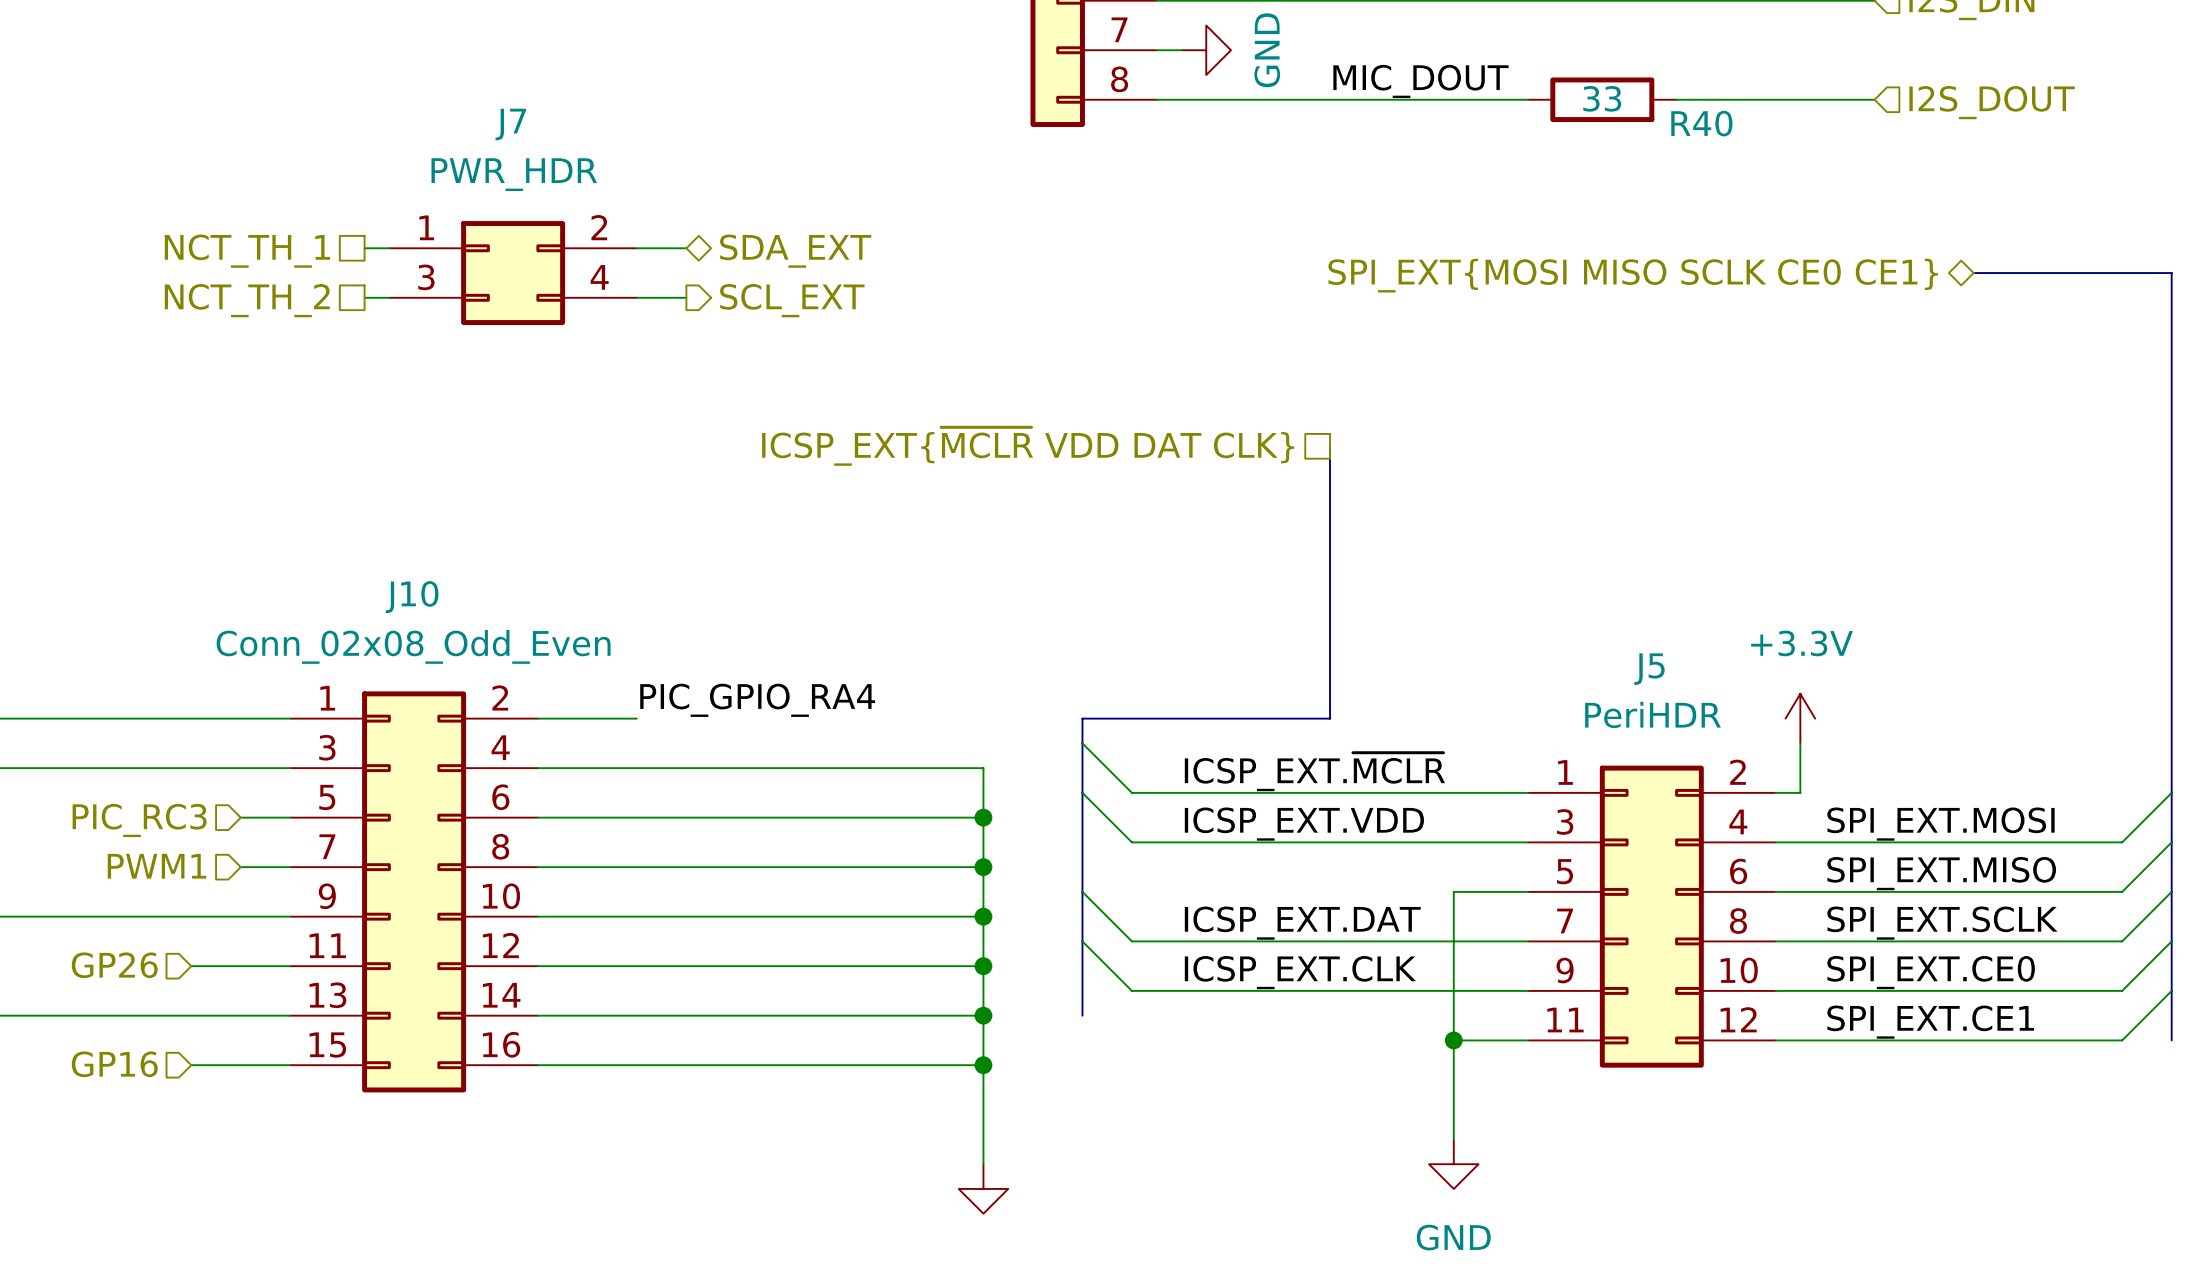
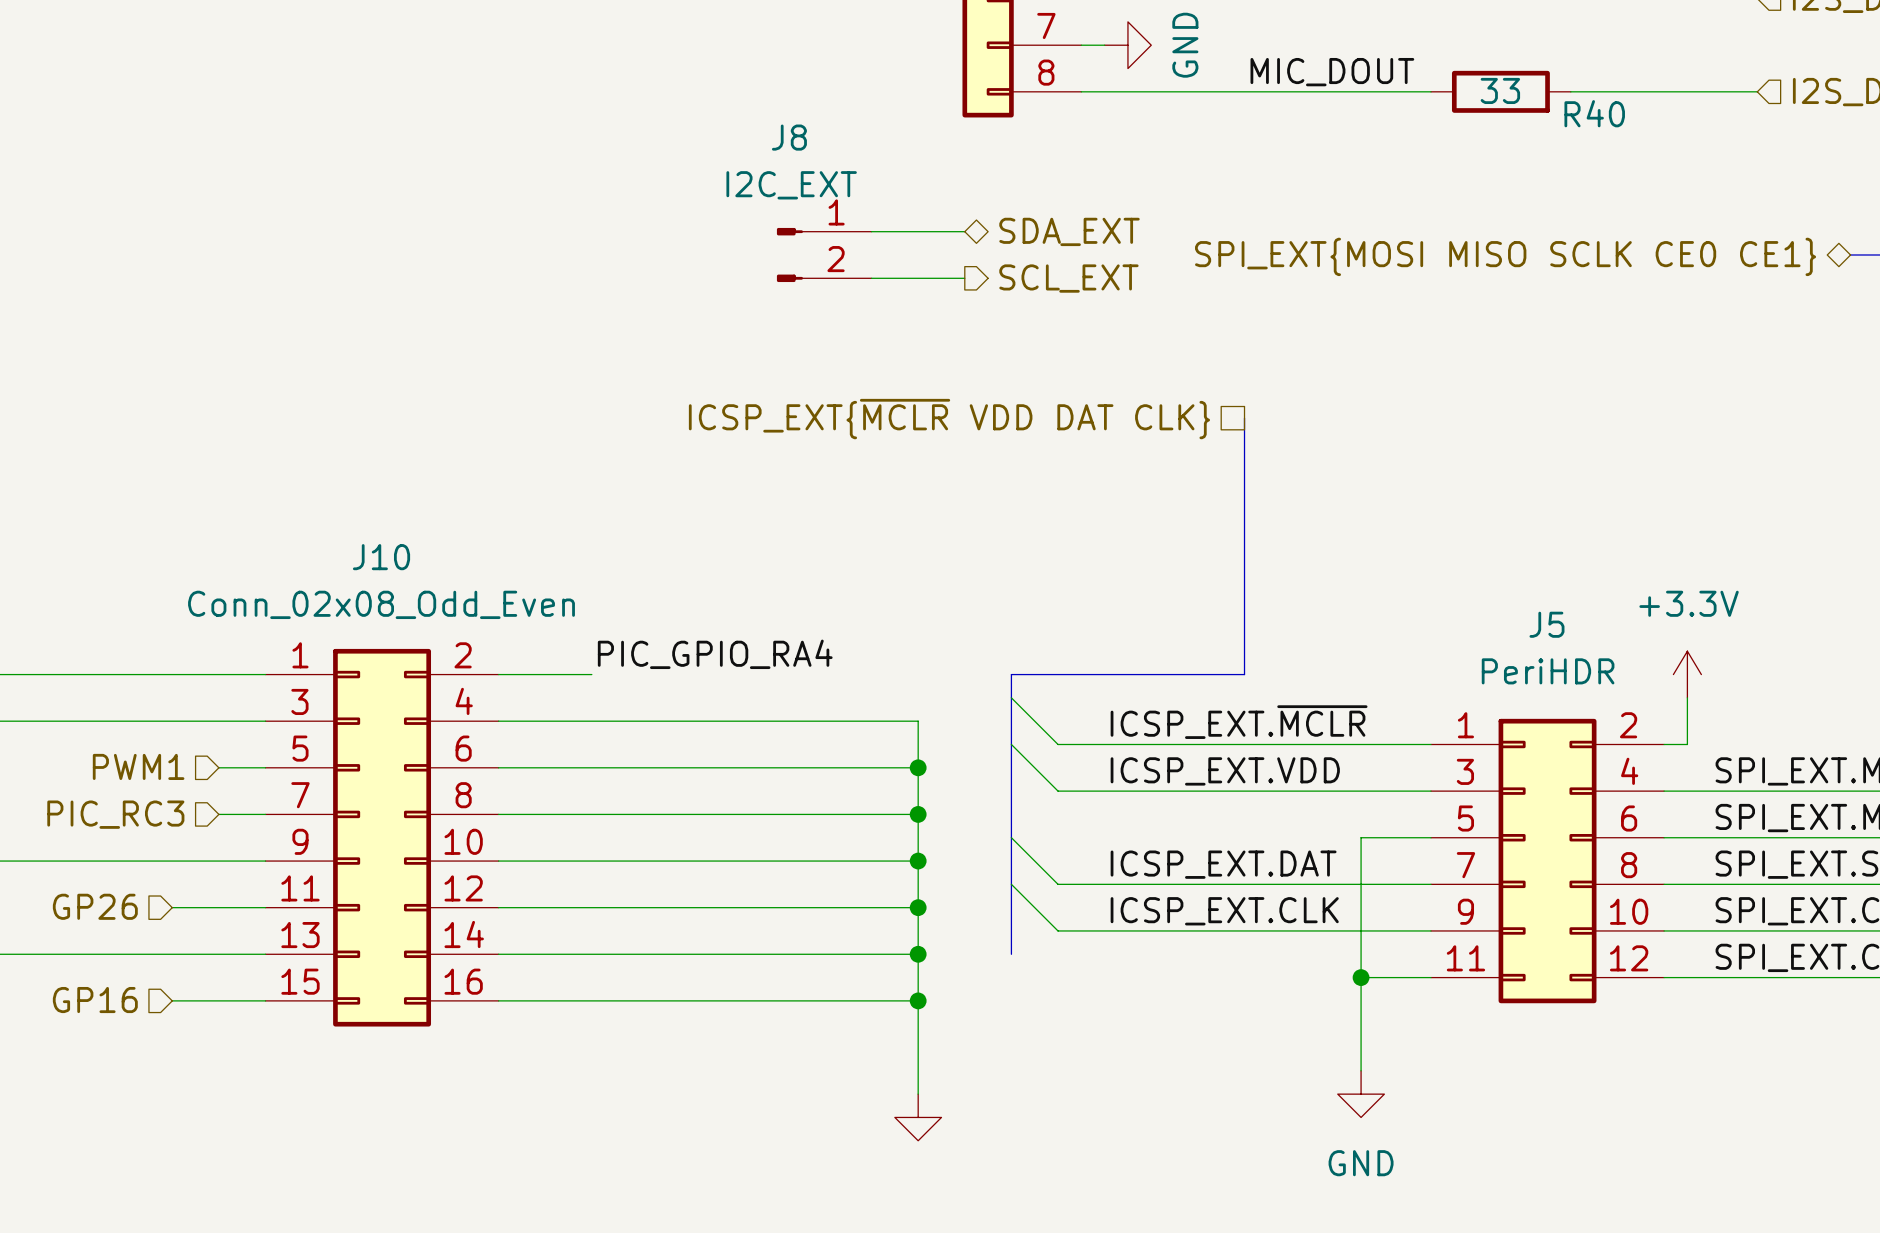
wire: (364, 248) (389, 248) -> none
wire: (636, 248) (686, 248) -> none
wire: none -> (871, 231) (964, 231)
hierarchical label: NCT_TH_1 (247, 251) -> none
hierarchical label position: SDA_EXT (795, 251) -> SDA_EXT (1069, 231)
J7: PWR_HDR (513, 273) -> none
J8: none -> I2C_EXT (824, 254)
wire: (364, 297) (389, 297) -> none
wire: (636, 297) (686, 297) -> none
wire: none -> (871, 278) (964, 278)
hierarchical label: NCT_TH_2 (247, 300) -> none
hierarchical label position: SCL_EXT (792, 300) -> SCL_EXT (1068, 278)
hierarchical label: PIC_RC3 (139, 820) -> PWM1 (138, 766)
hierarchical label: PWM1 (156, 866) -> PIC_RC3 (115, 814)

